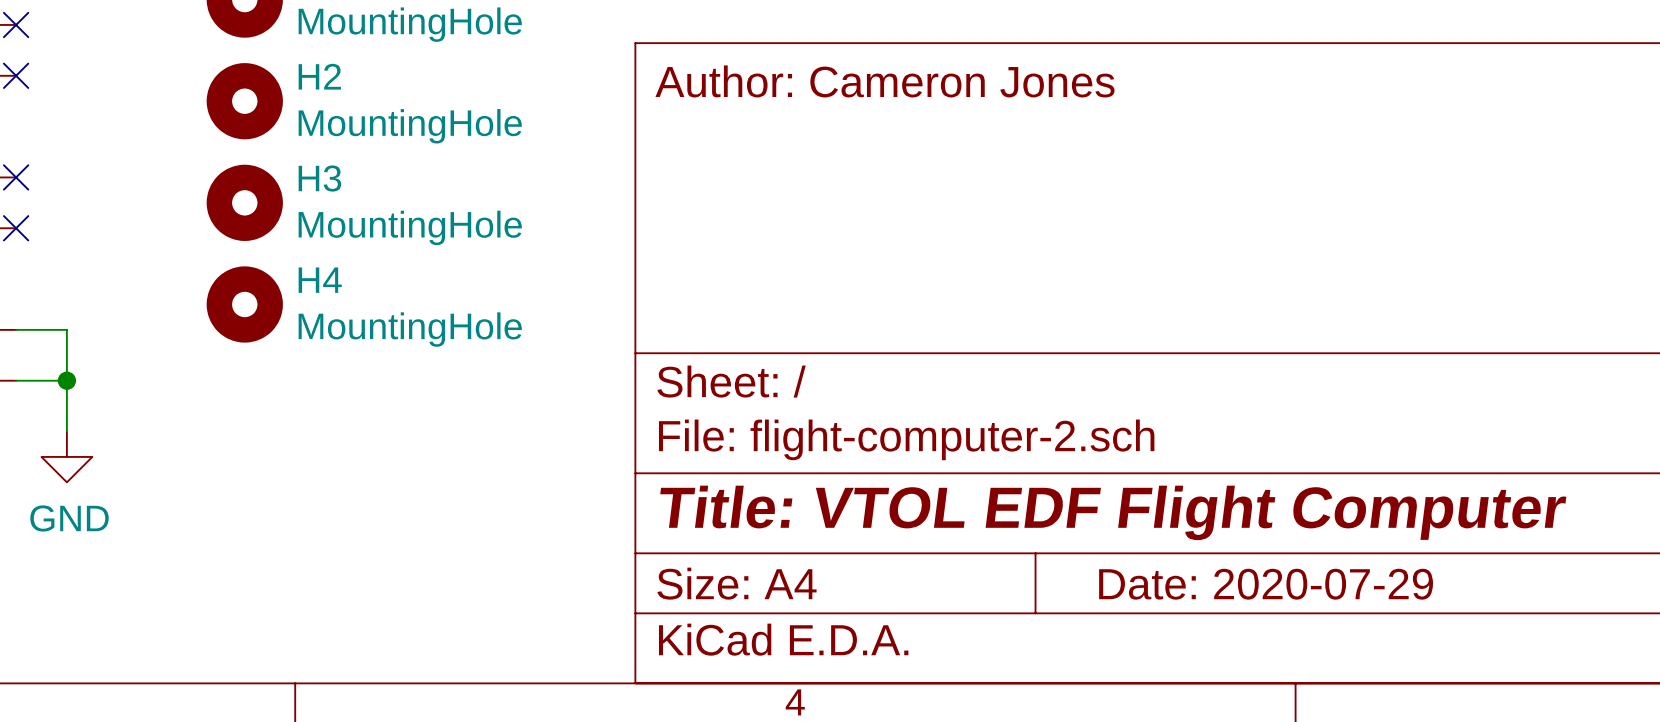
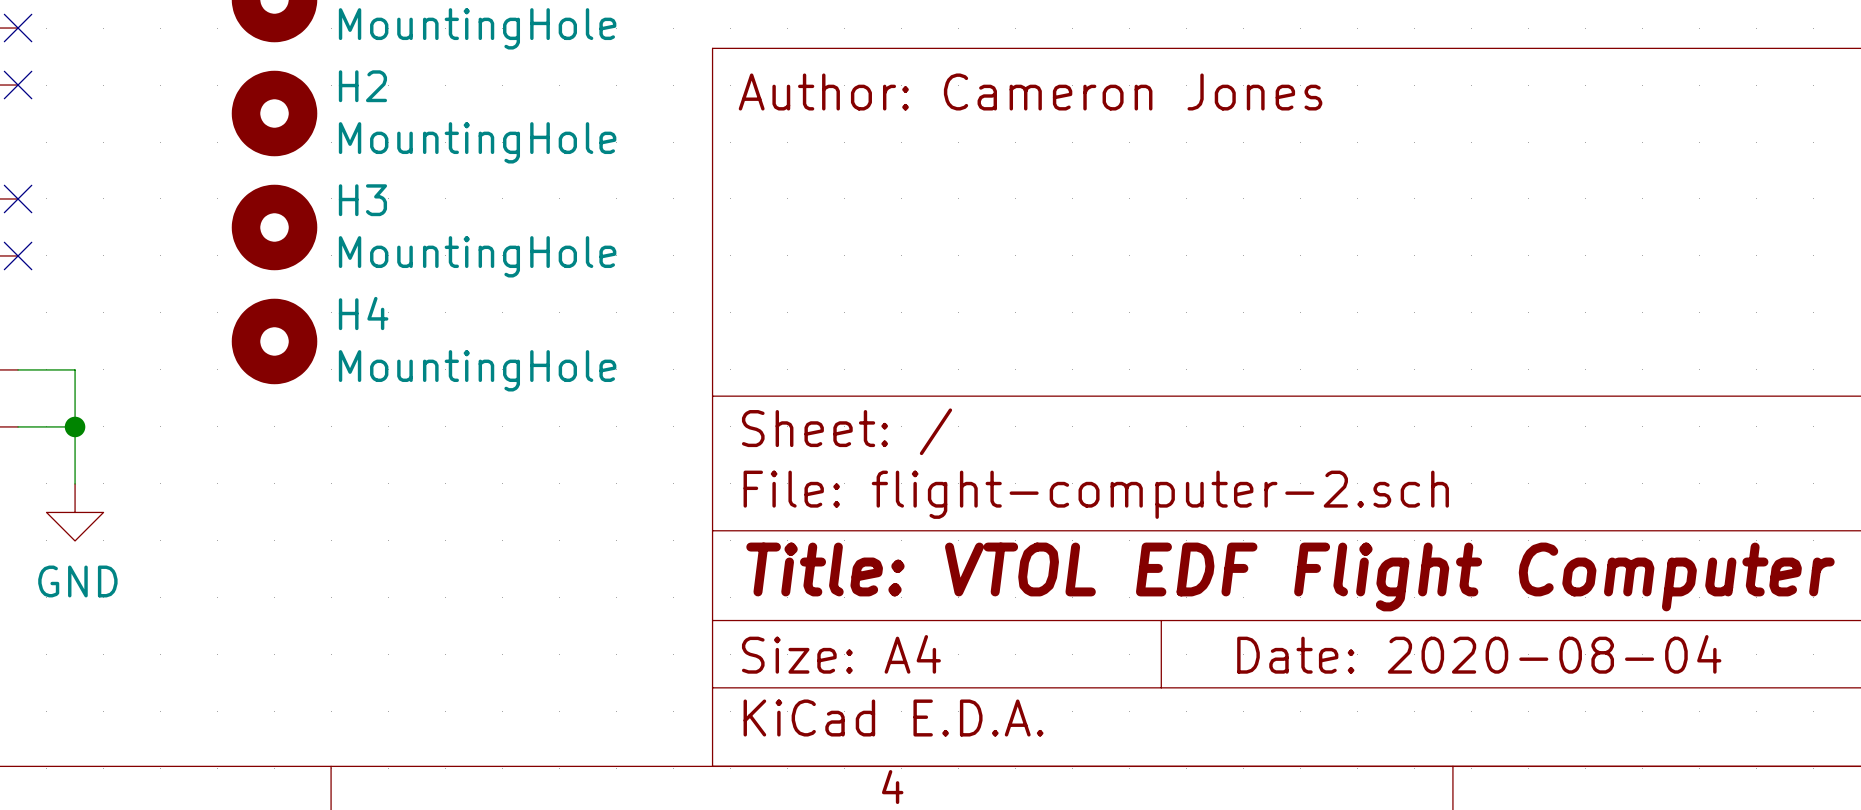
title block: Date: 2020-07-29 (1266, 584) -> Date: 2020-08-04 (1479, 654)

